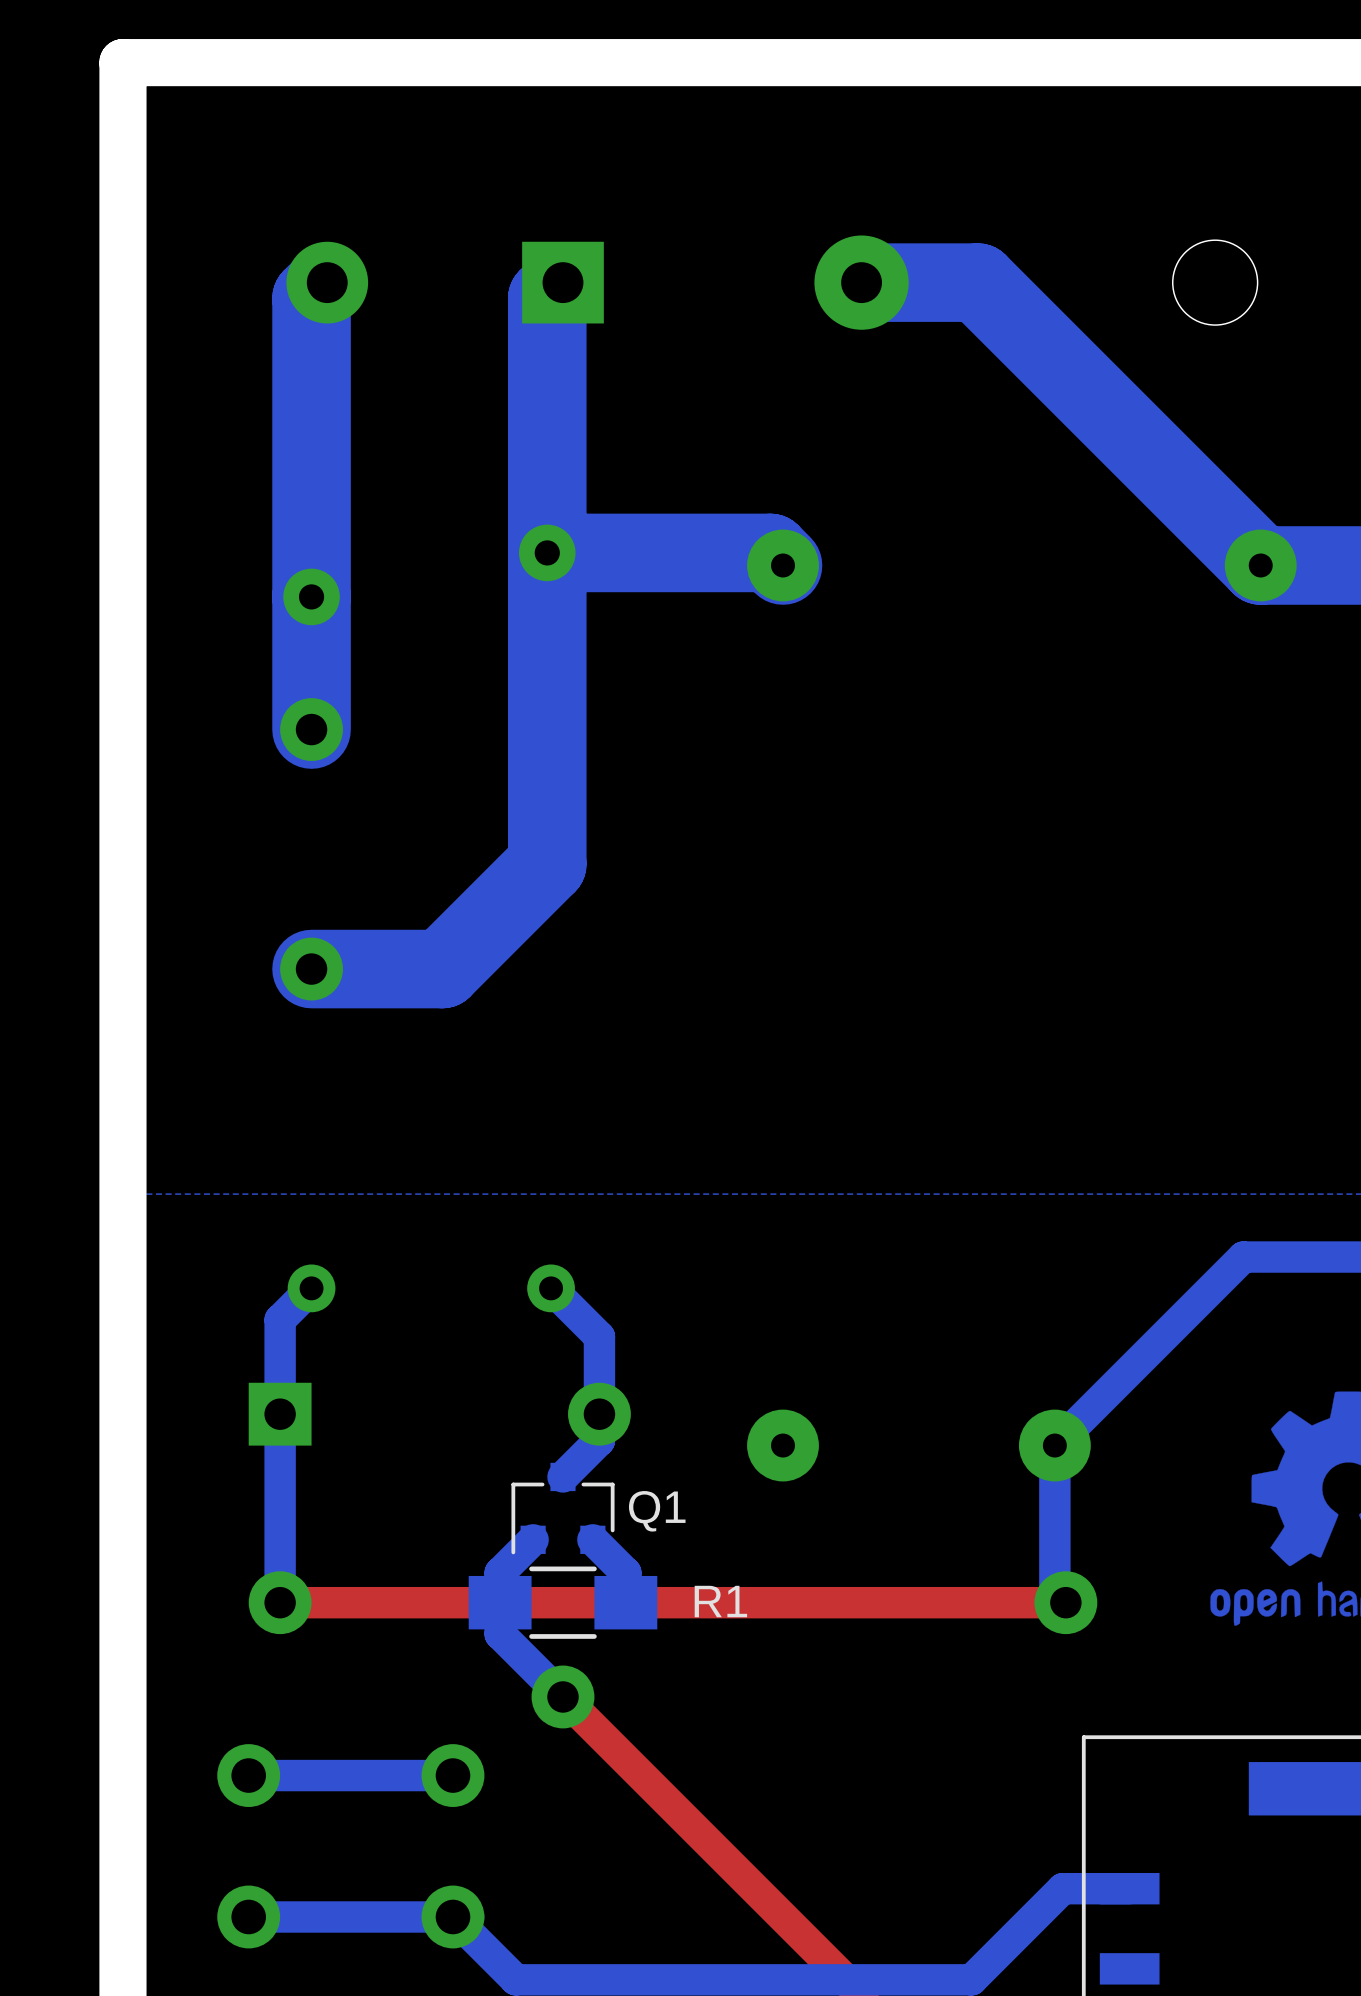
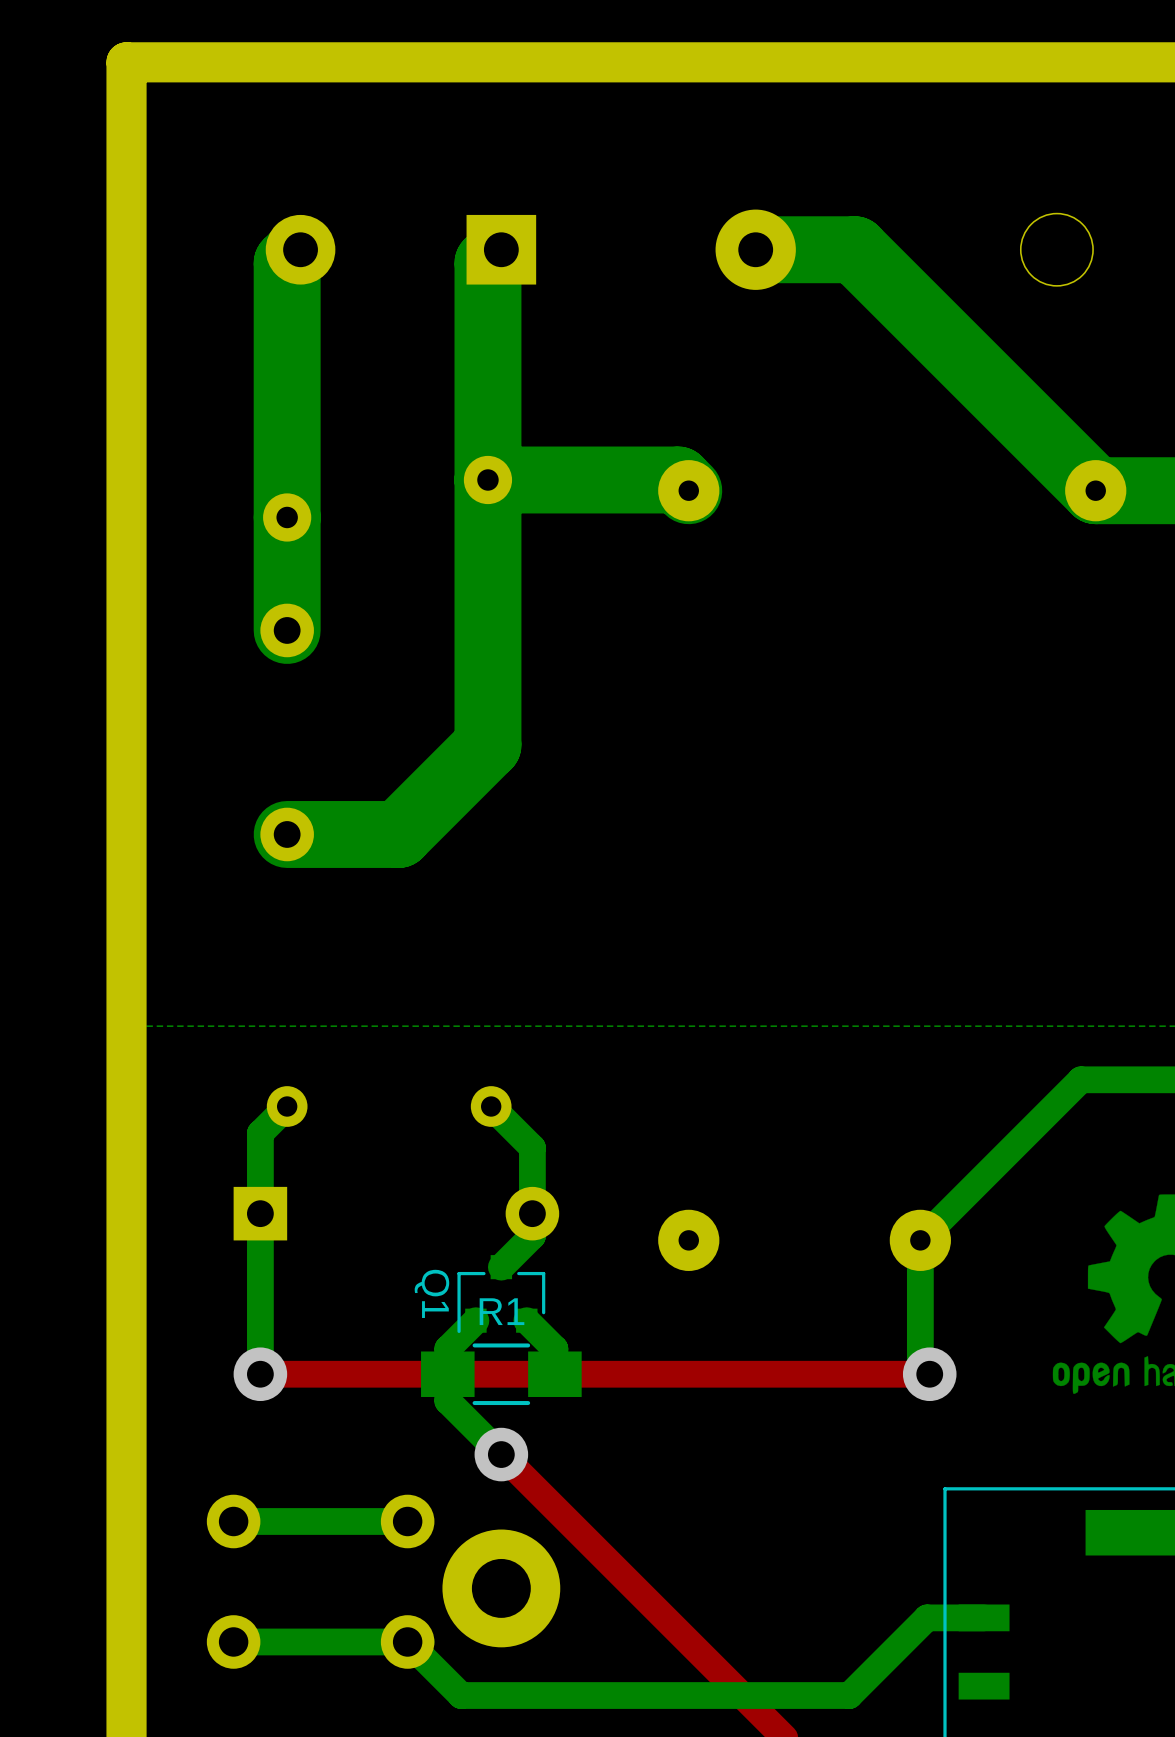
Q1 name rotation: 0° (657, 1511) -> 90° clockwise (431, 1293)
Q1 name position: Q1 (657, 1511) -> Q1 (431, 1293)
R1 name position: R1 (720, 1601) -> R1 (502, 1311)
part: none -> (501, 1588)

